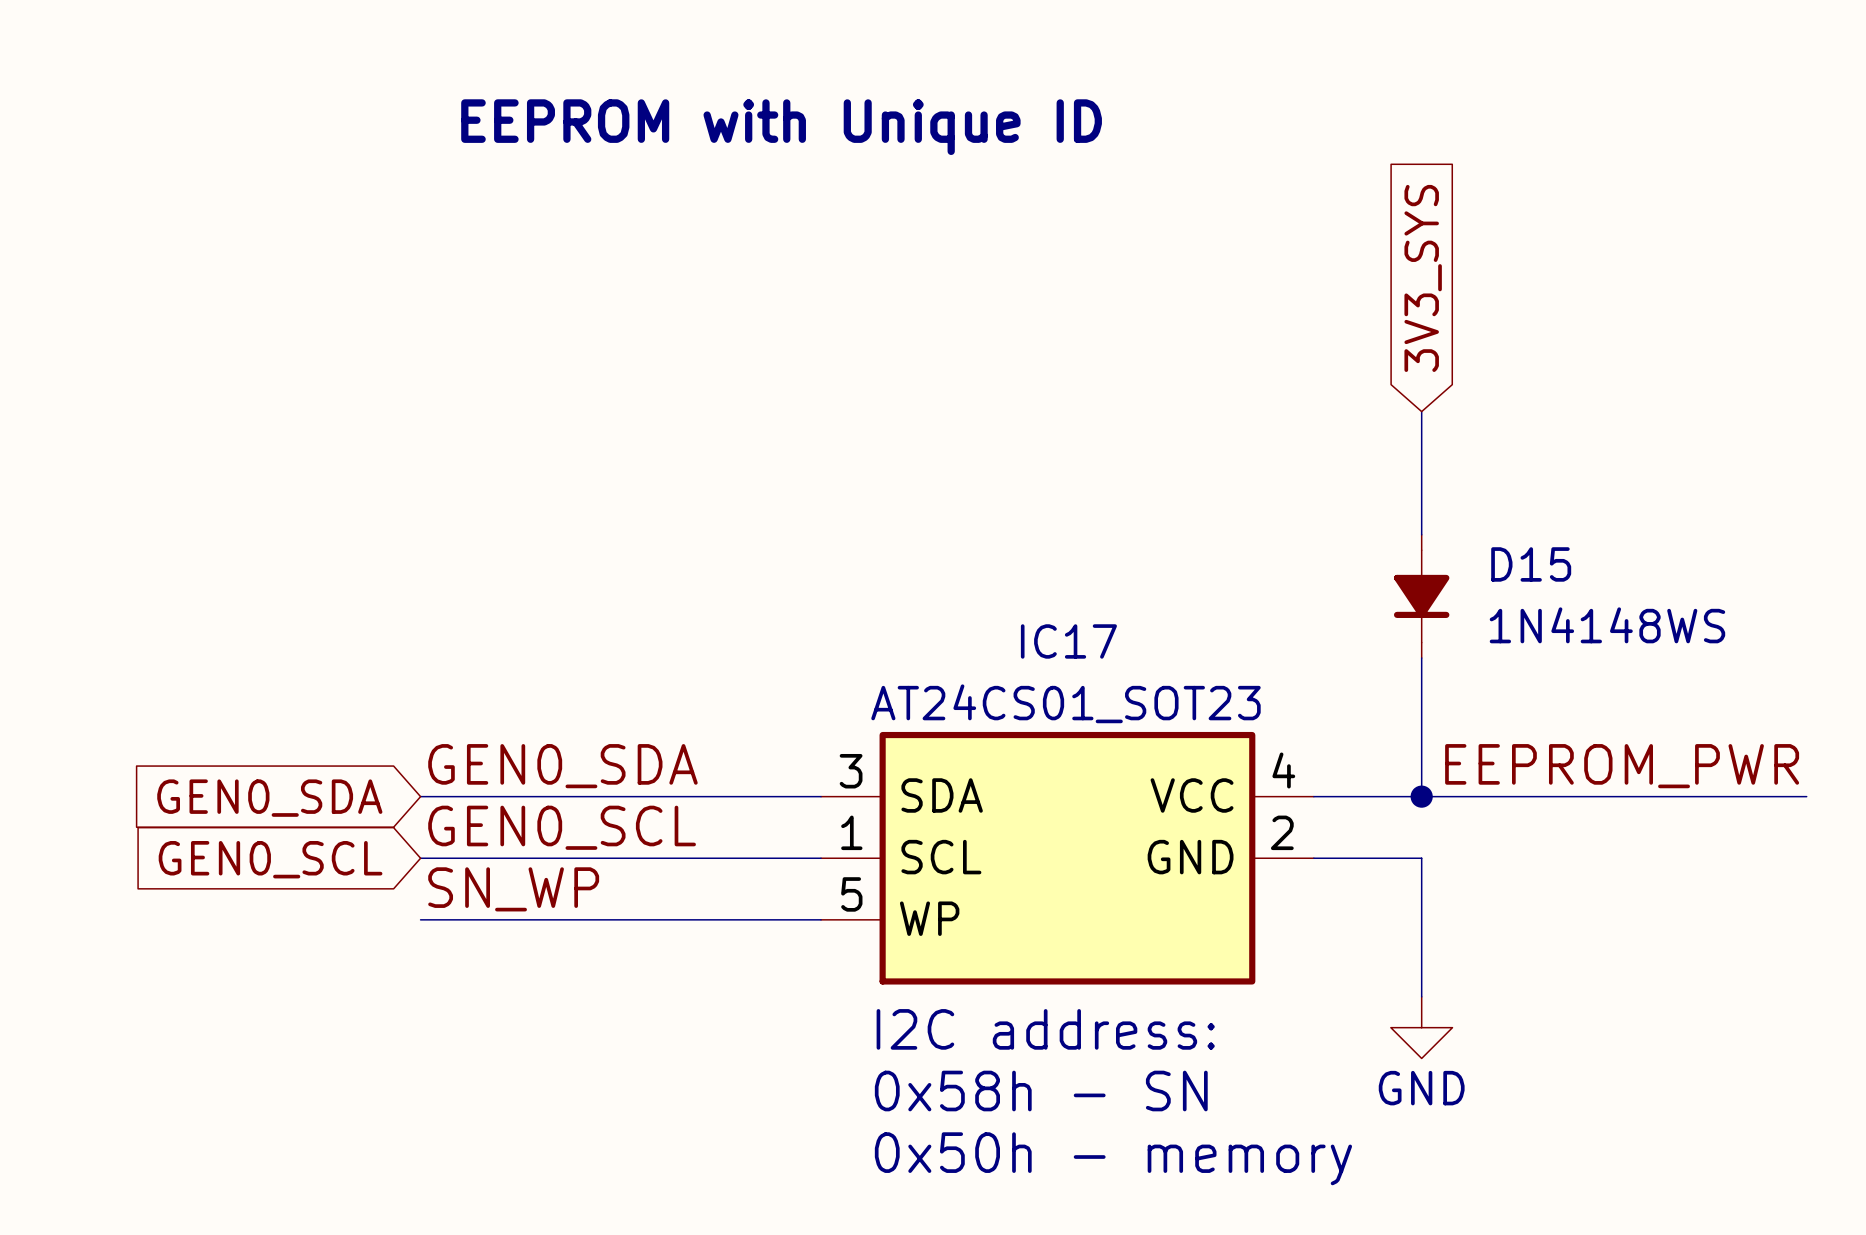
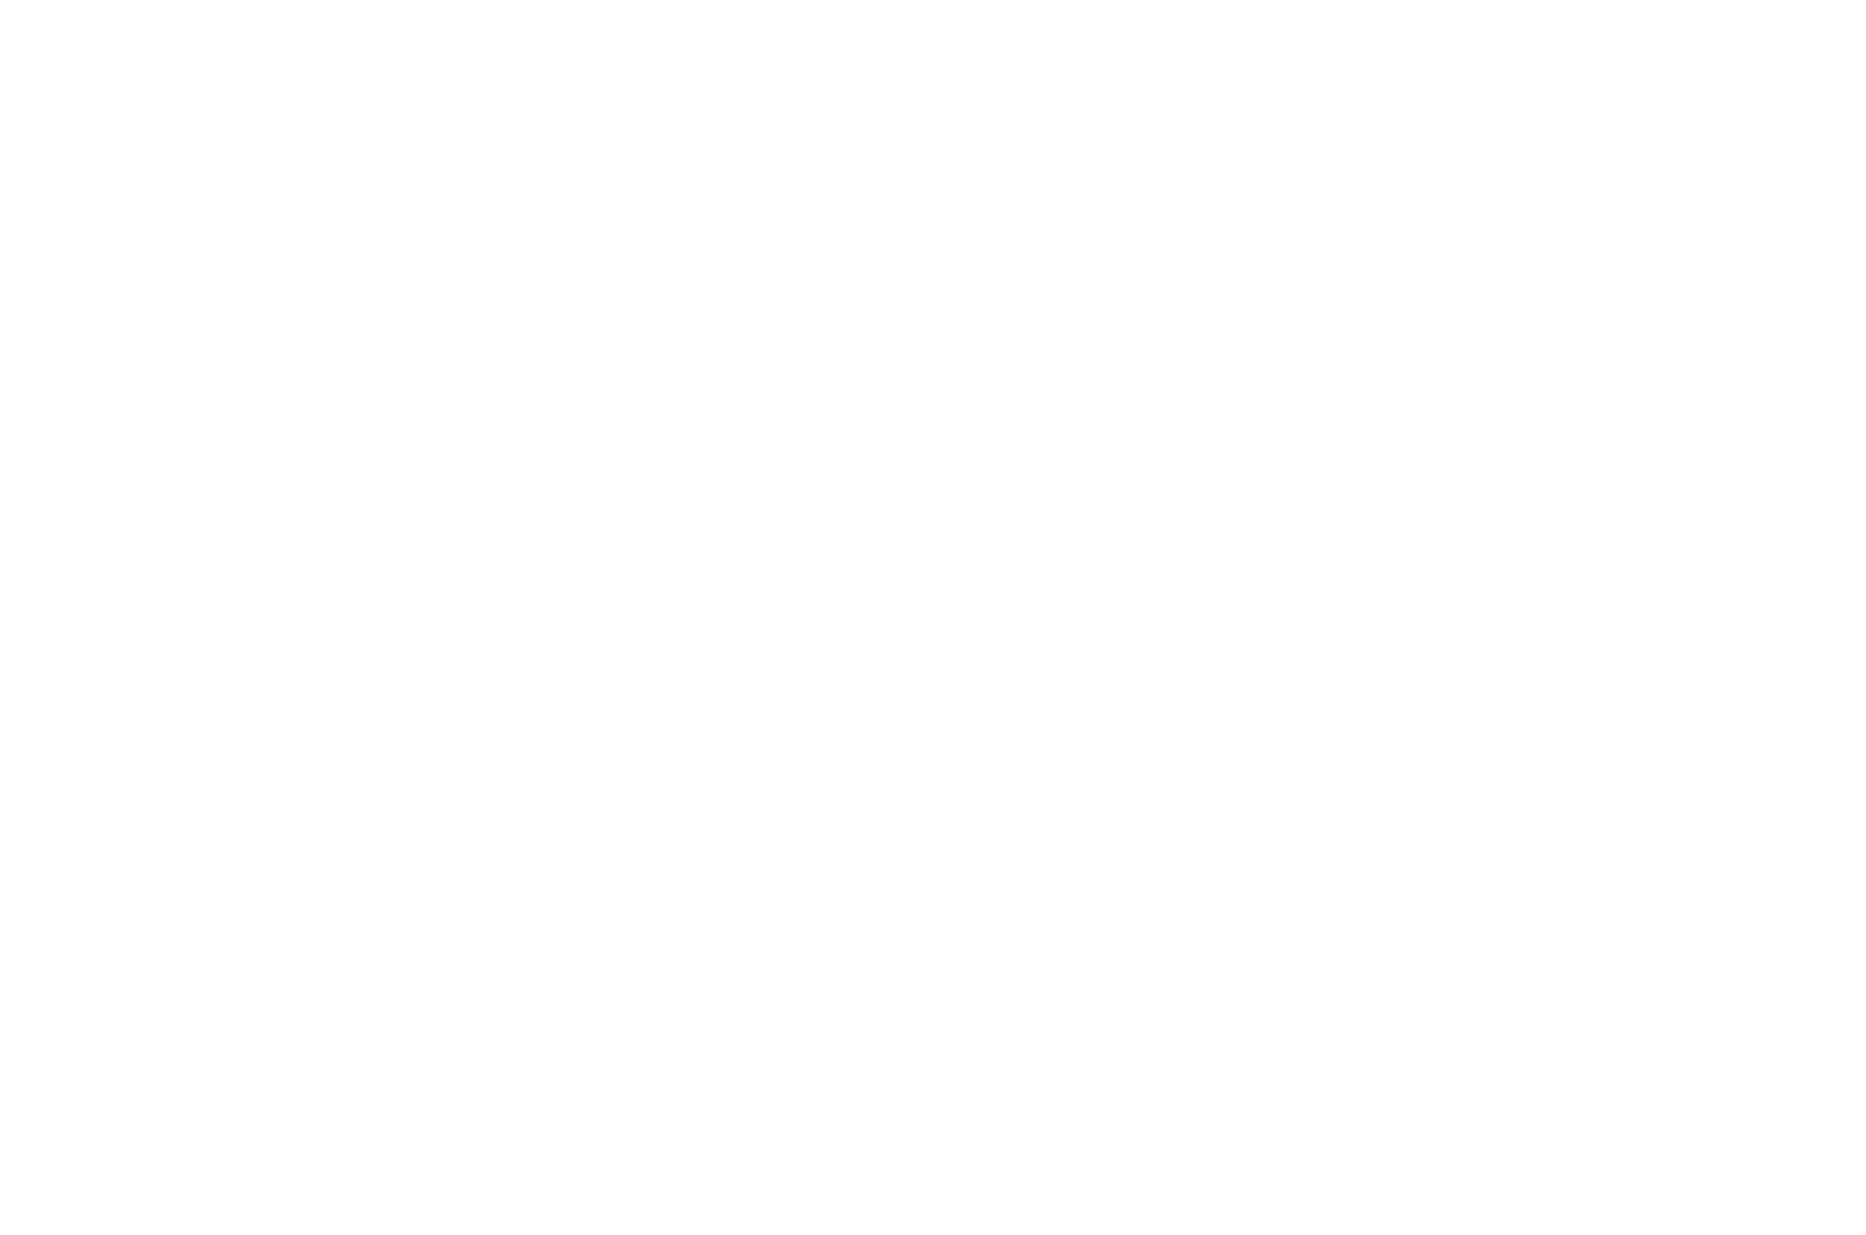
text: EEPROM with Unique ID (781, 127) -> none
global label: 3V3_SYS (1423, 278) -> none
wire: (1421, 411) (1421, 534) -> none
D15: (1421, 596) -> none
wire: (1421, 658) (1421, 796) -> none
label: GEN0_SDA (562, 766) -> none
label: EEPROM_PWR (1622, 766) -> none
wire: (420, 796) (821, 796) -> none
wire: (1313, 796) (1806, 796) -> none
junction: (1421, 796) -> none
global label: GEN0_SDA (269, 798) -> none
label: GEN0_SCL (562, 827) -> none
wire: (420, 858) (821, 858) -> none
IC17: AT24CS01_SOT23 (1067, 858) -> none
wire: (1313, 858) (1421, 858) (1421, 996) -> none
global label: GEN0_SCL (270, 859) -> none
label: SN_WP (513, 889) -> none
wire: (420, 919) (821, 919) -> none
power symbol: GND (1421, 1027) -> none
text: I2C address: (1045, 1029) -> none
text: 0x58h - SN (1041, 1091) -> none
text: 0x50h - memory (1113, 1158) -> none

